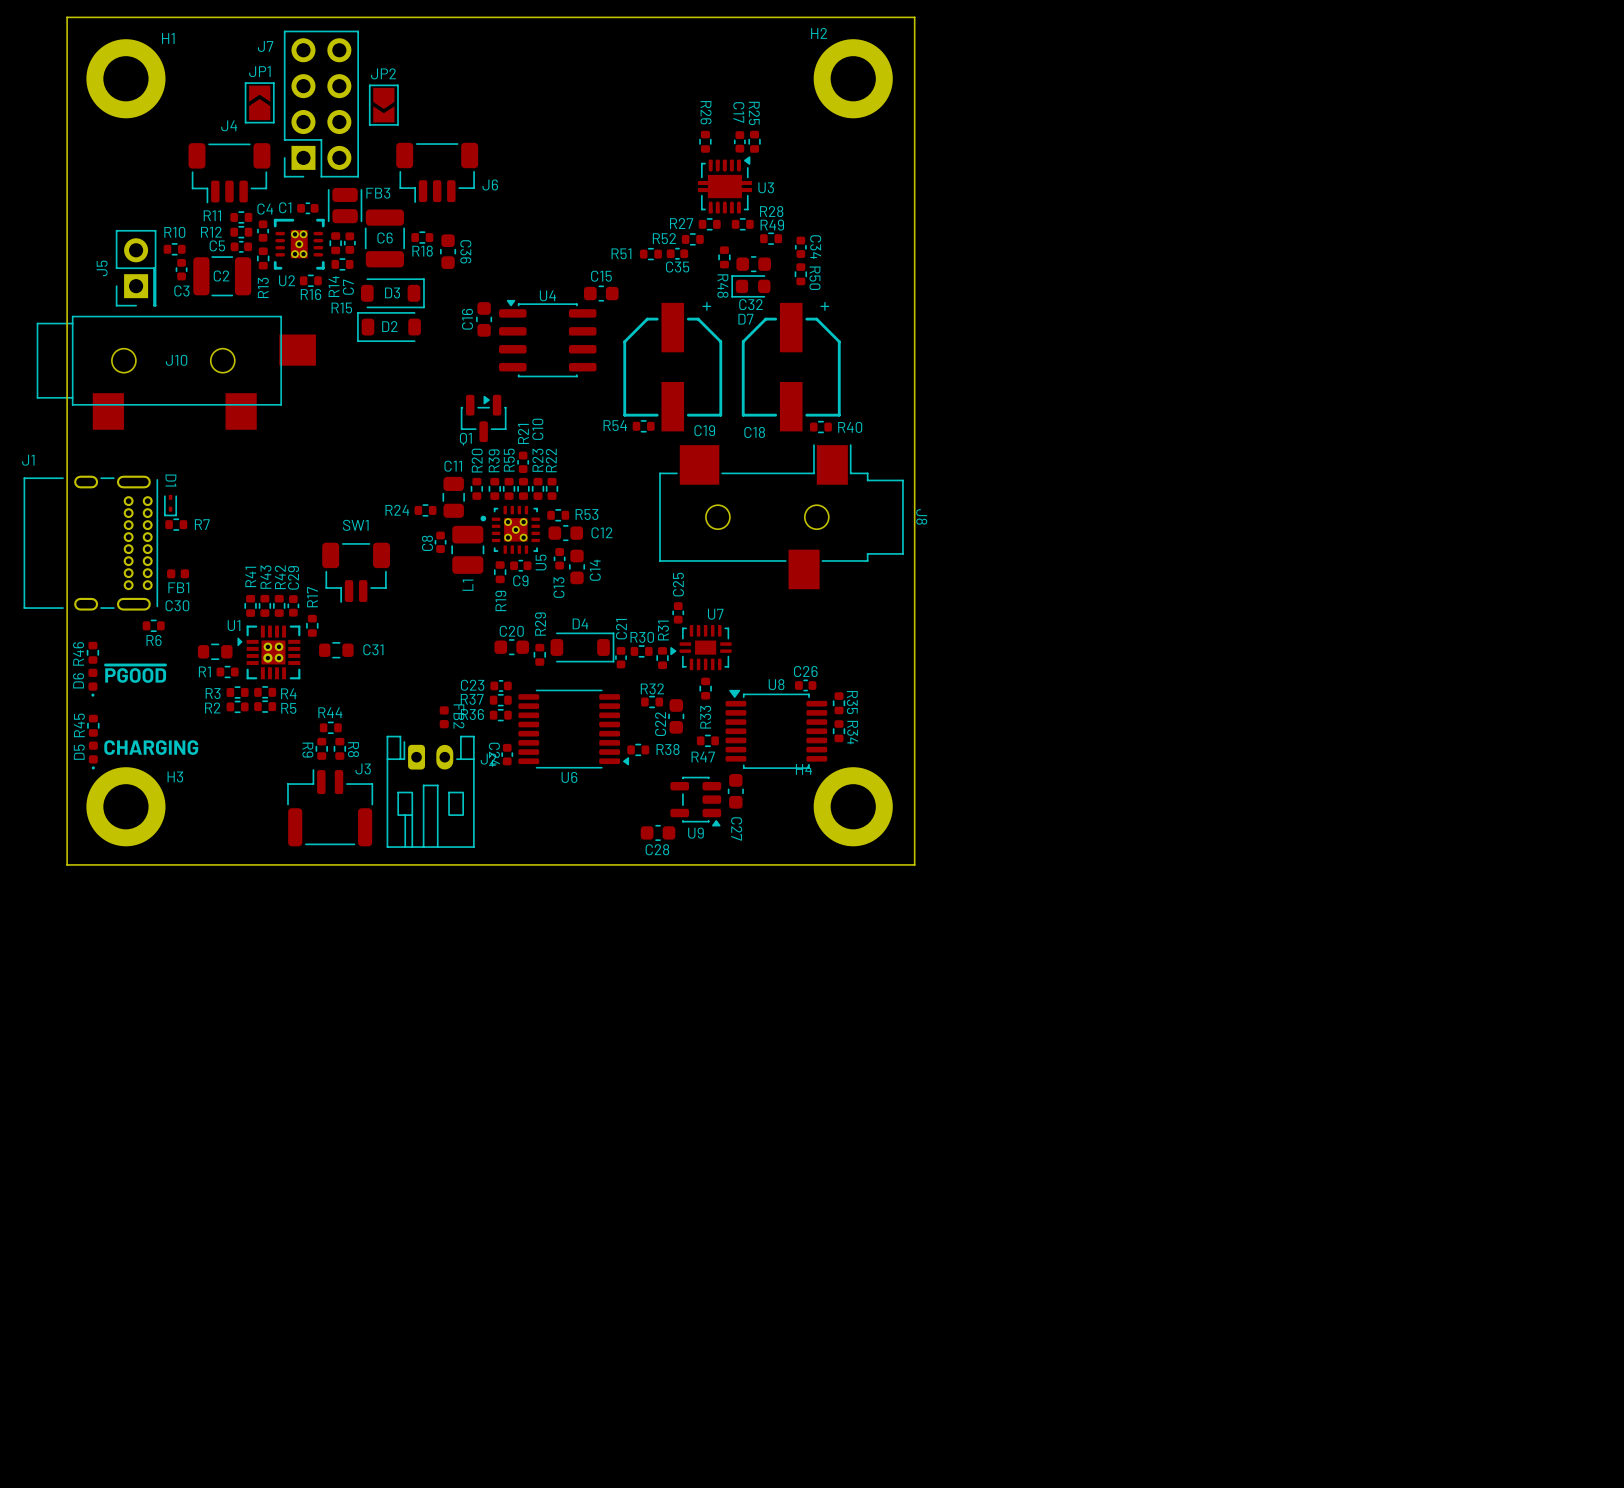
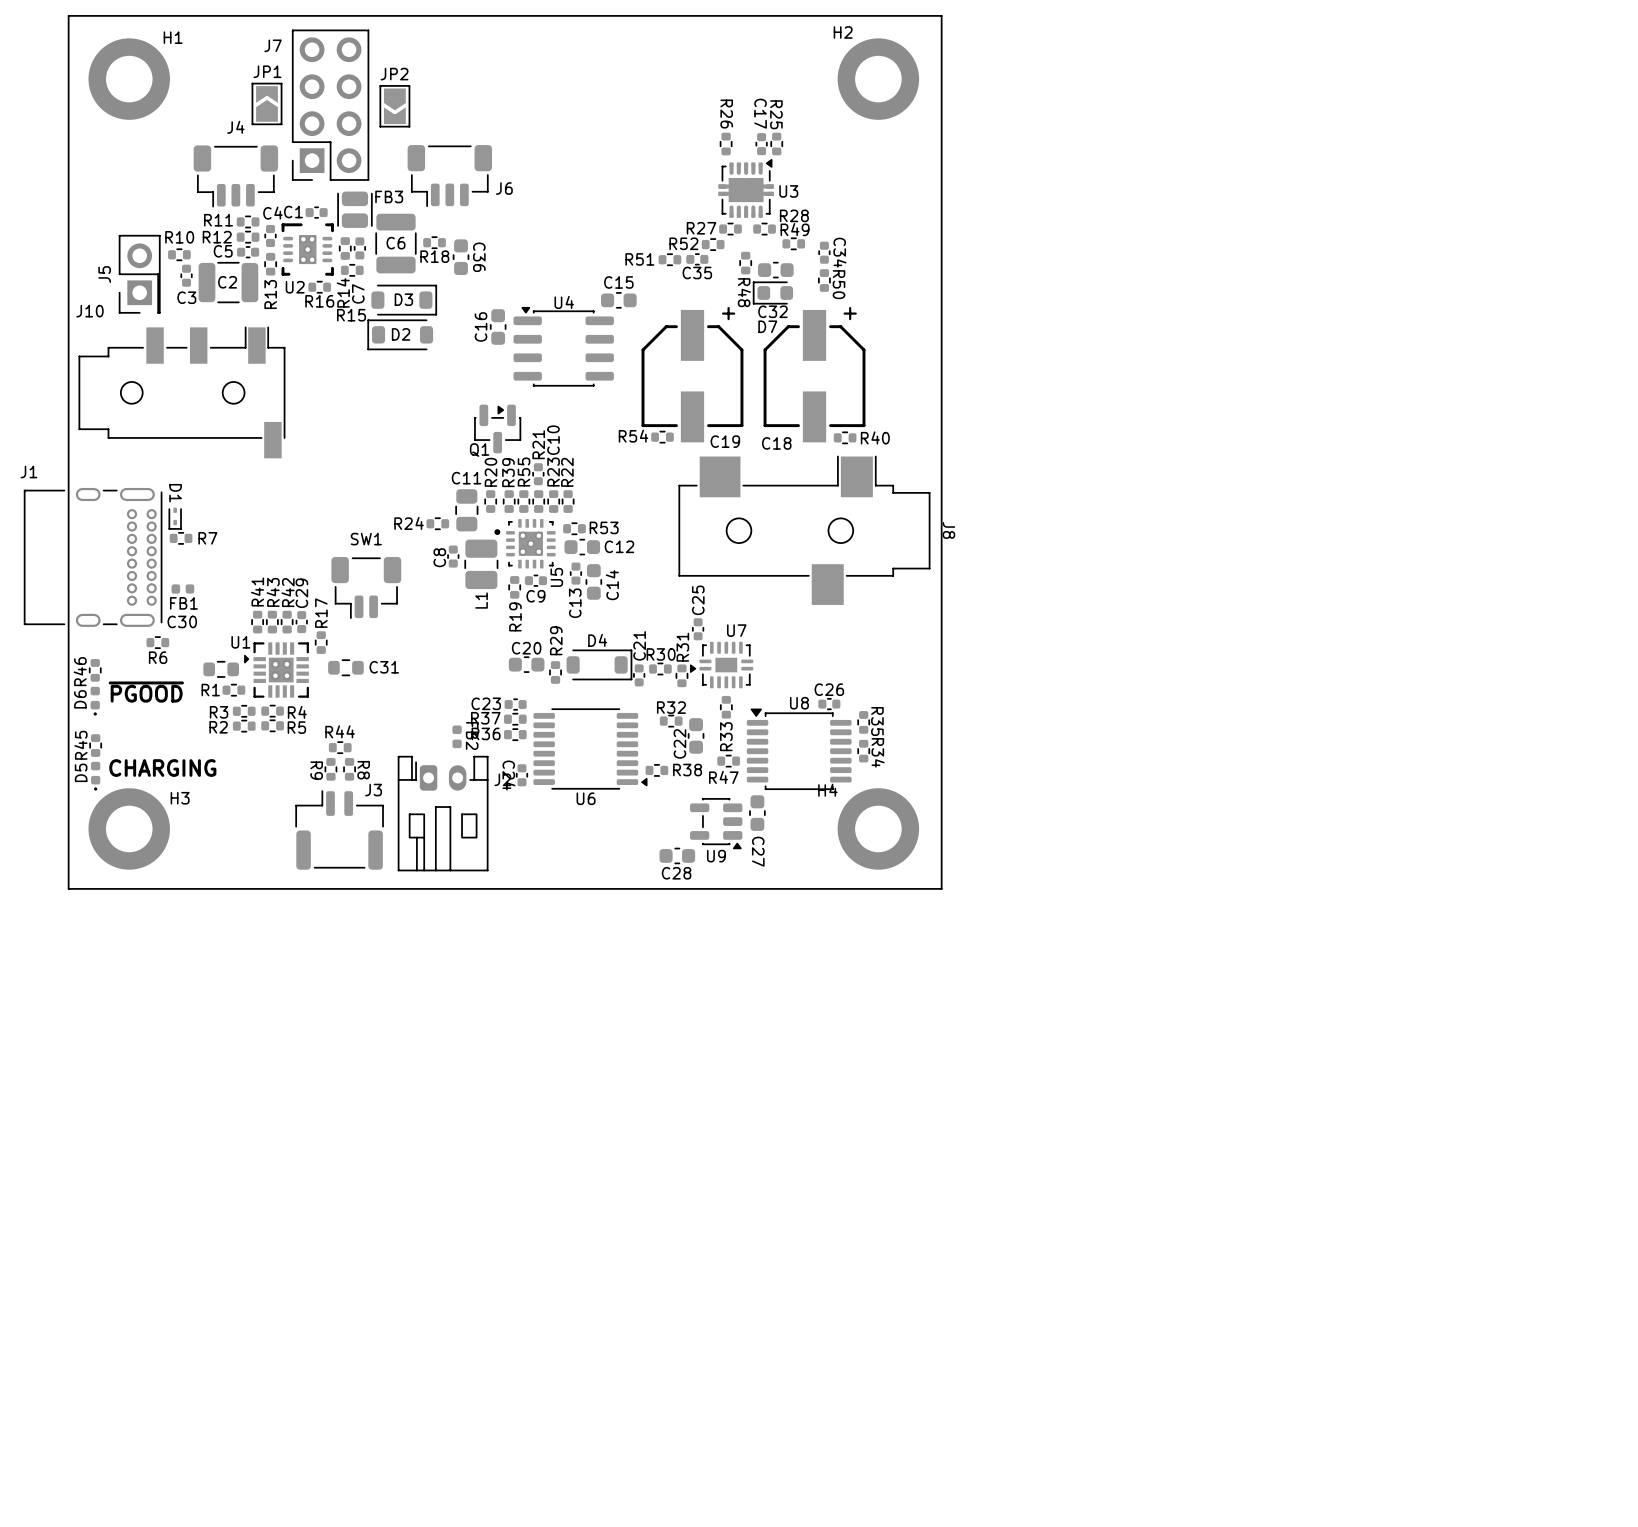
J10 footprint: [36, 315, 316, 430] -> [78, 326, 286, 459]
J10 name position: J10 (176, 360) -> J10 (89, 311)

